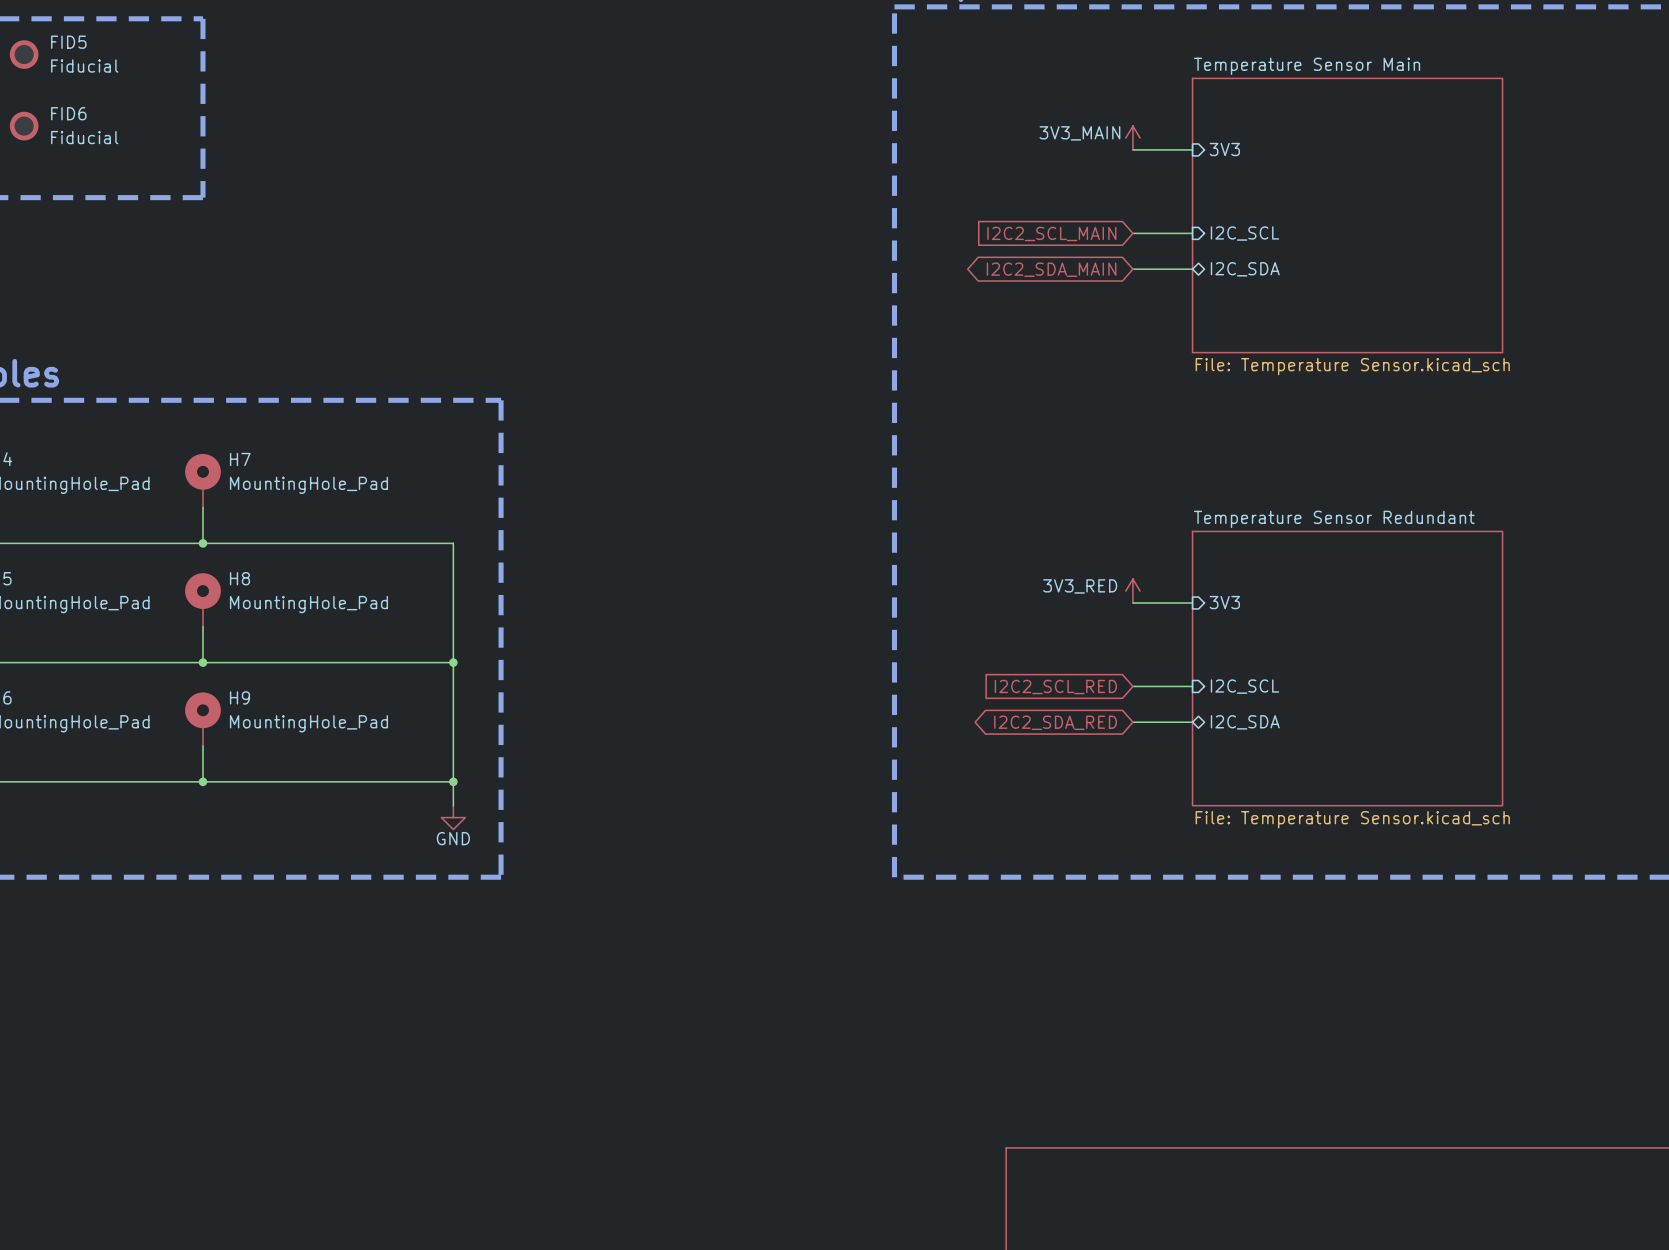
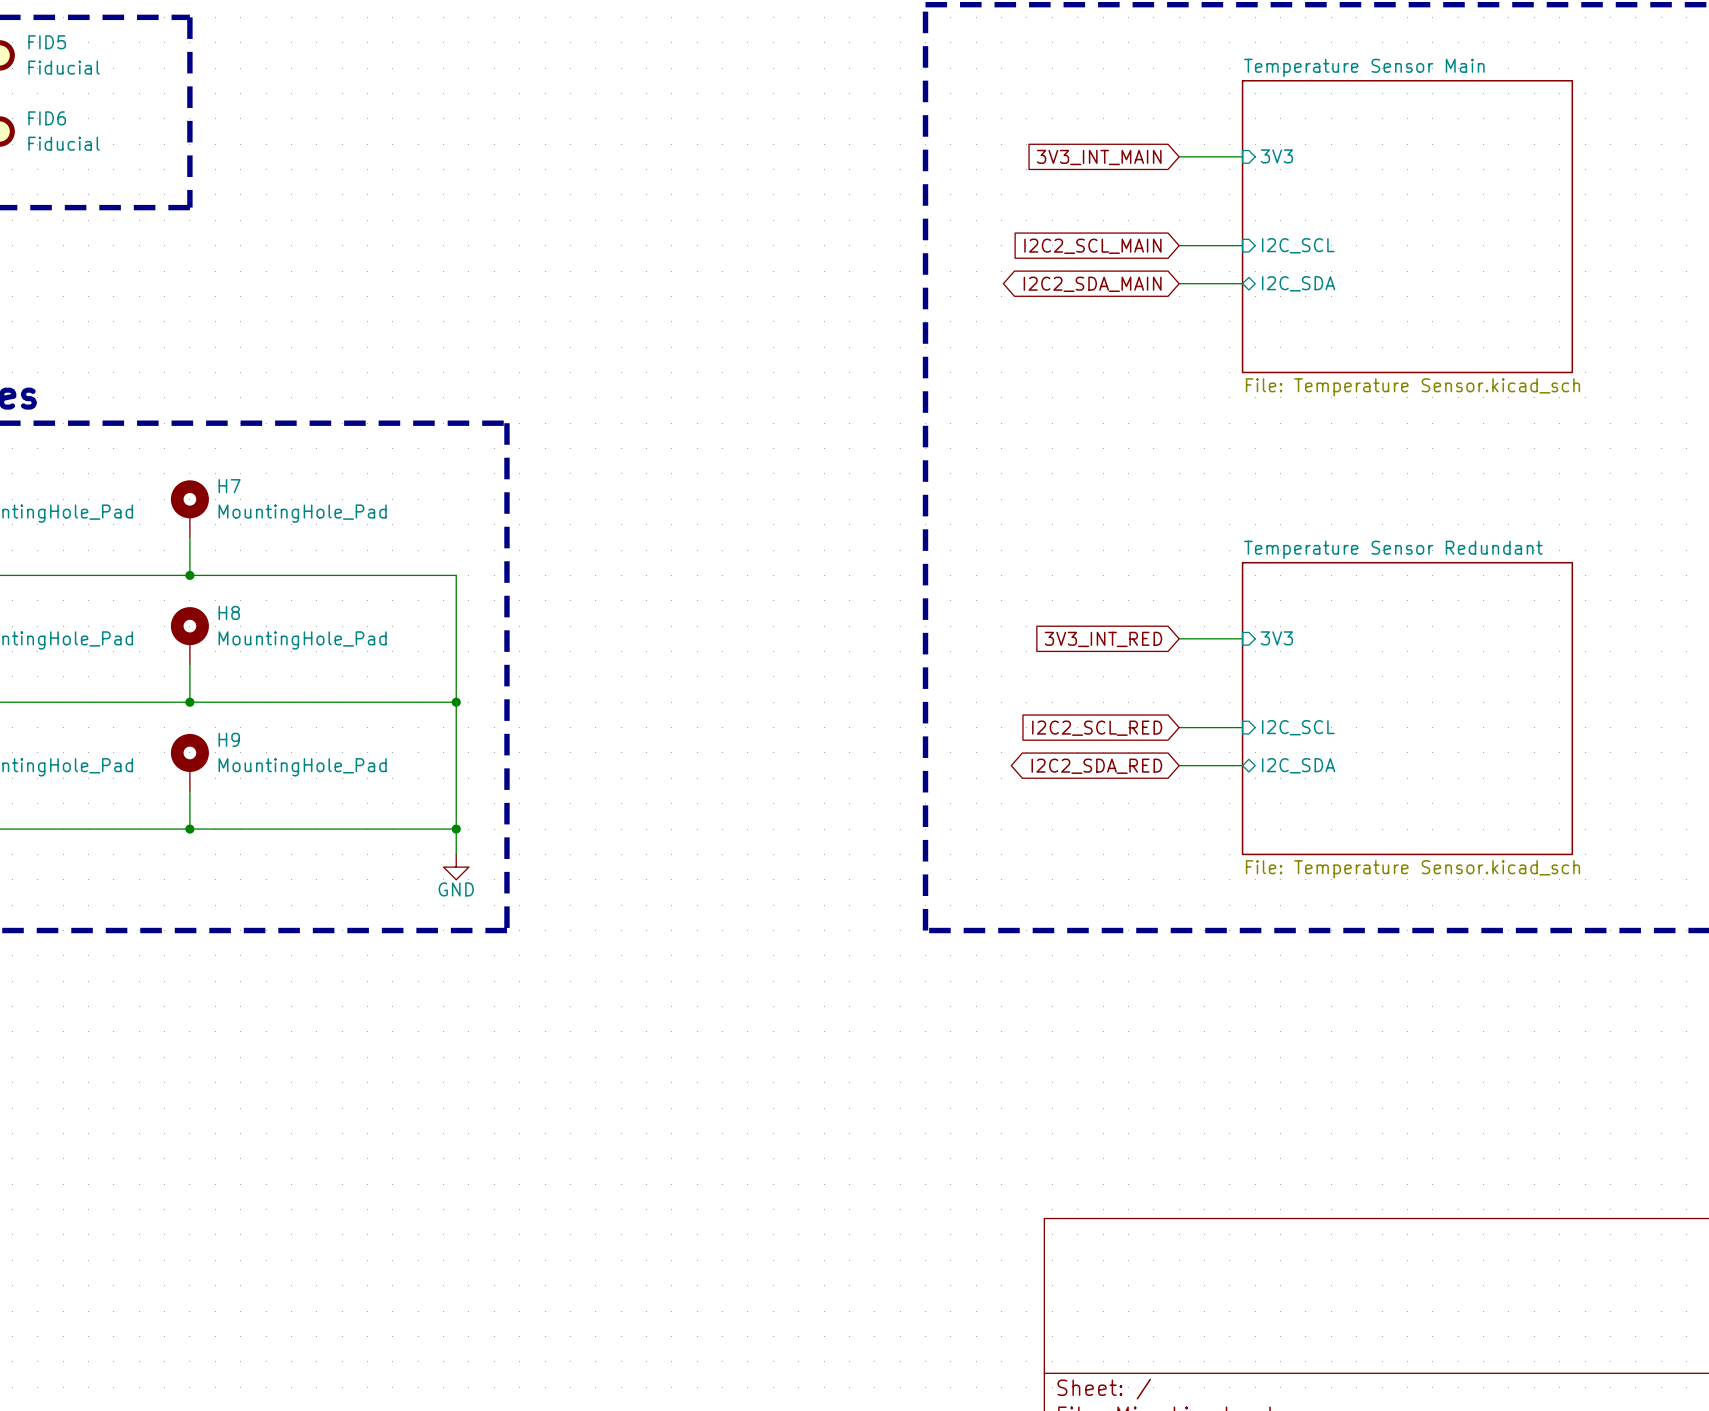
power symbol: 3V3_MAIN (1132, 138) -> none
global label: none -> 3V3_INT_MAIN (1099, 157)
power symbol: 3V3_RED (1132, 591) -> none
global label: none -> 3V3_INT_RED (1103, 639)

